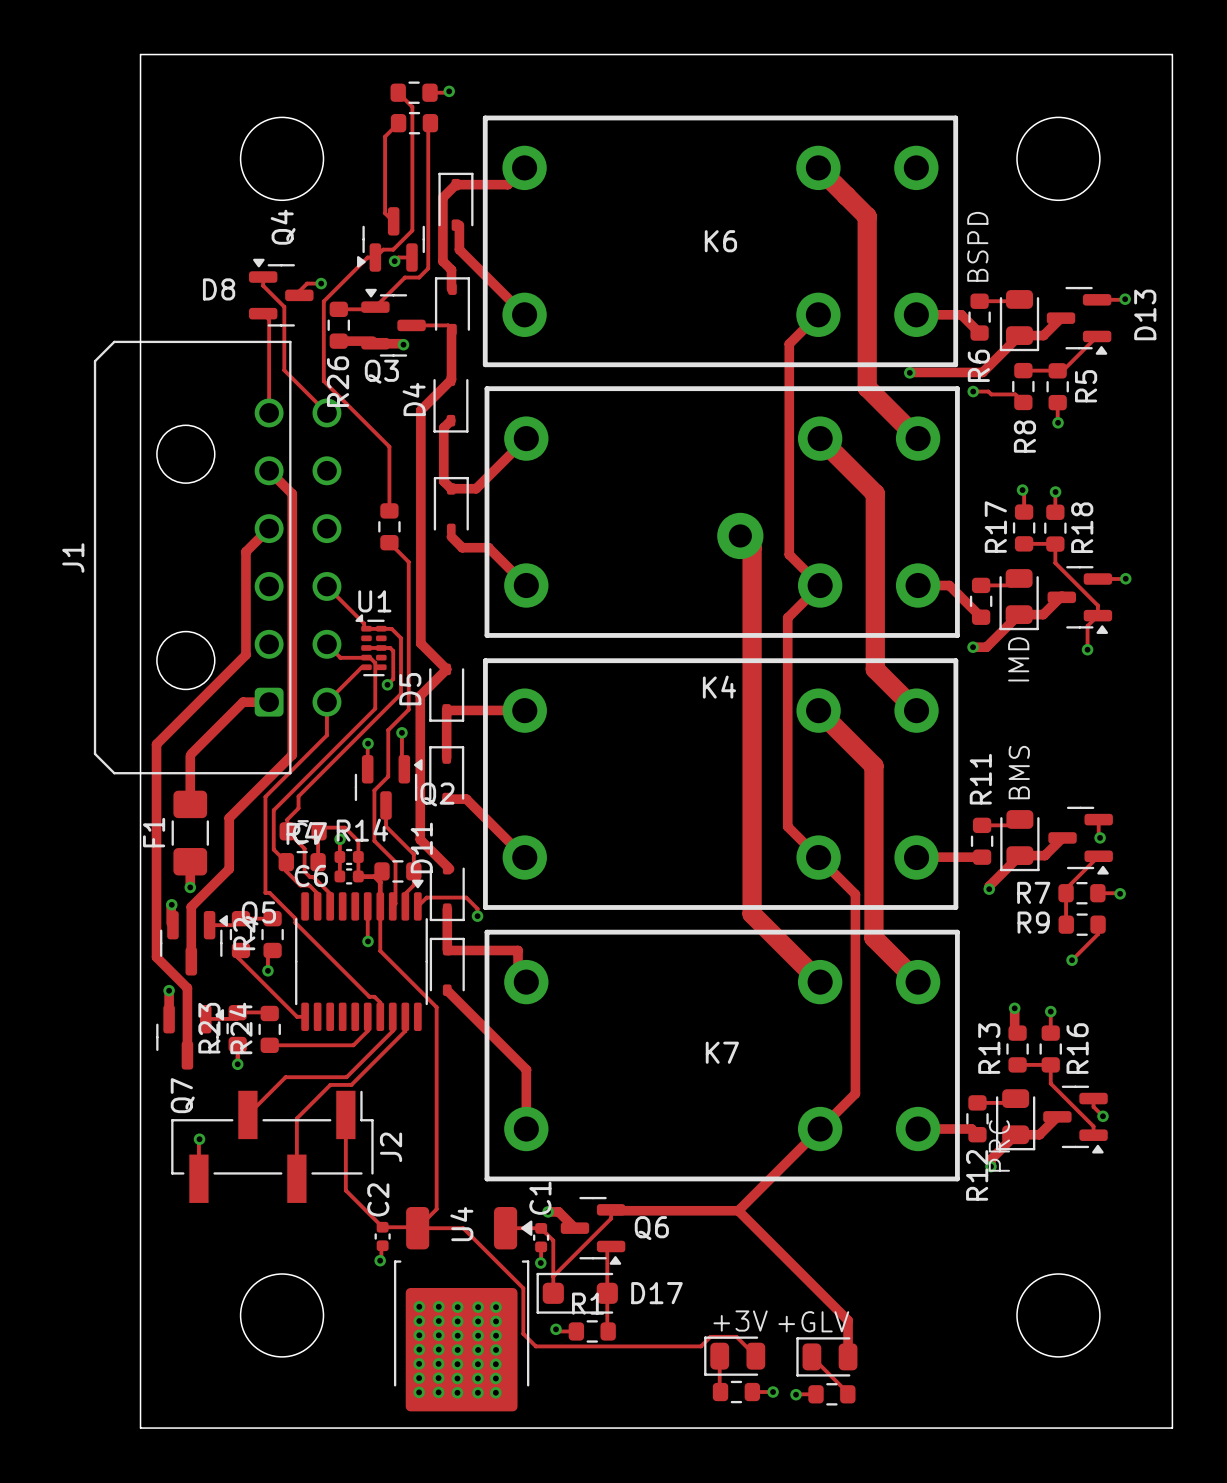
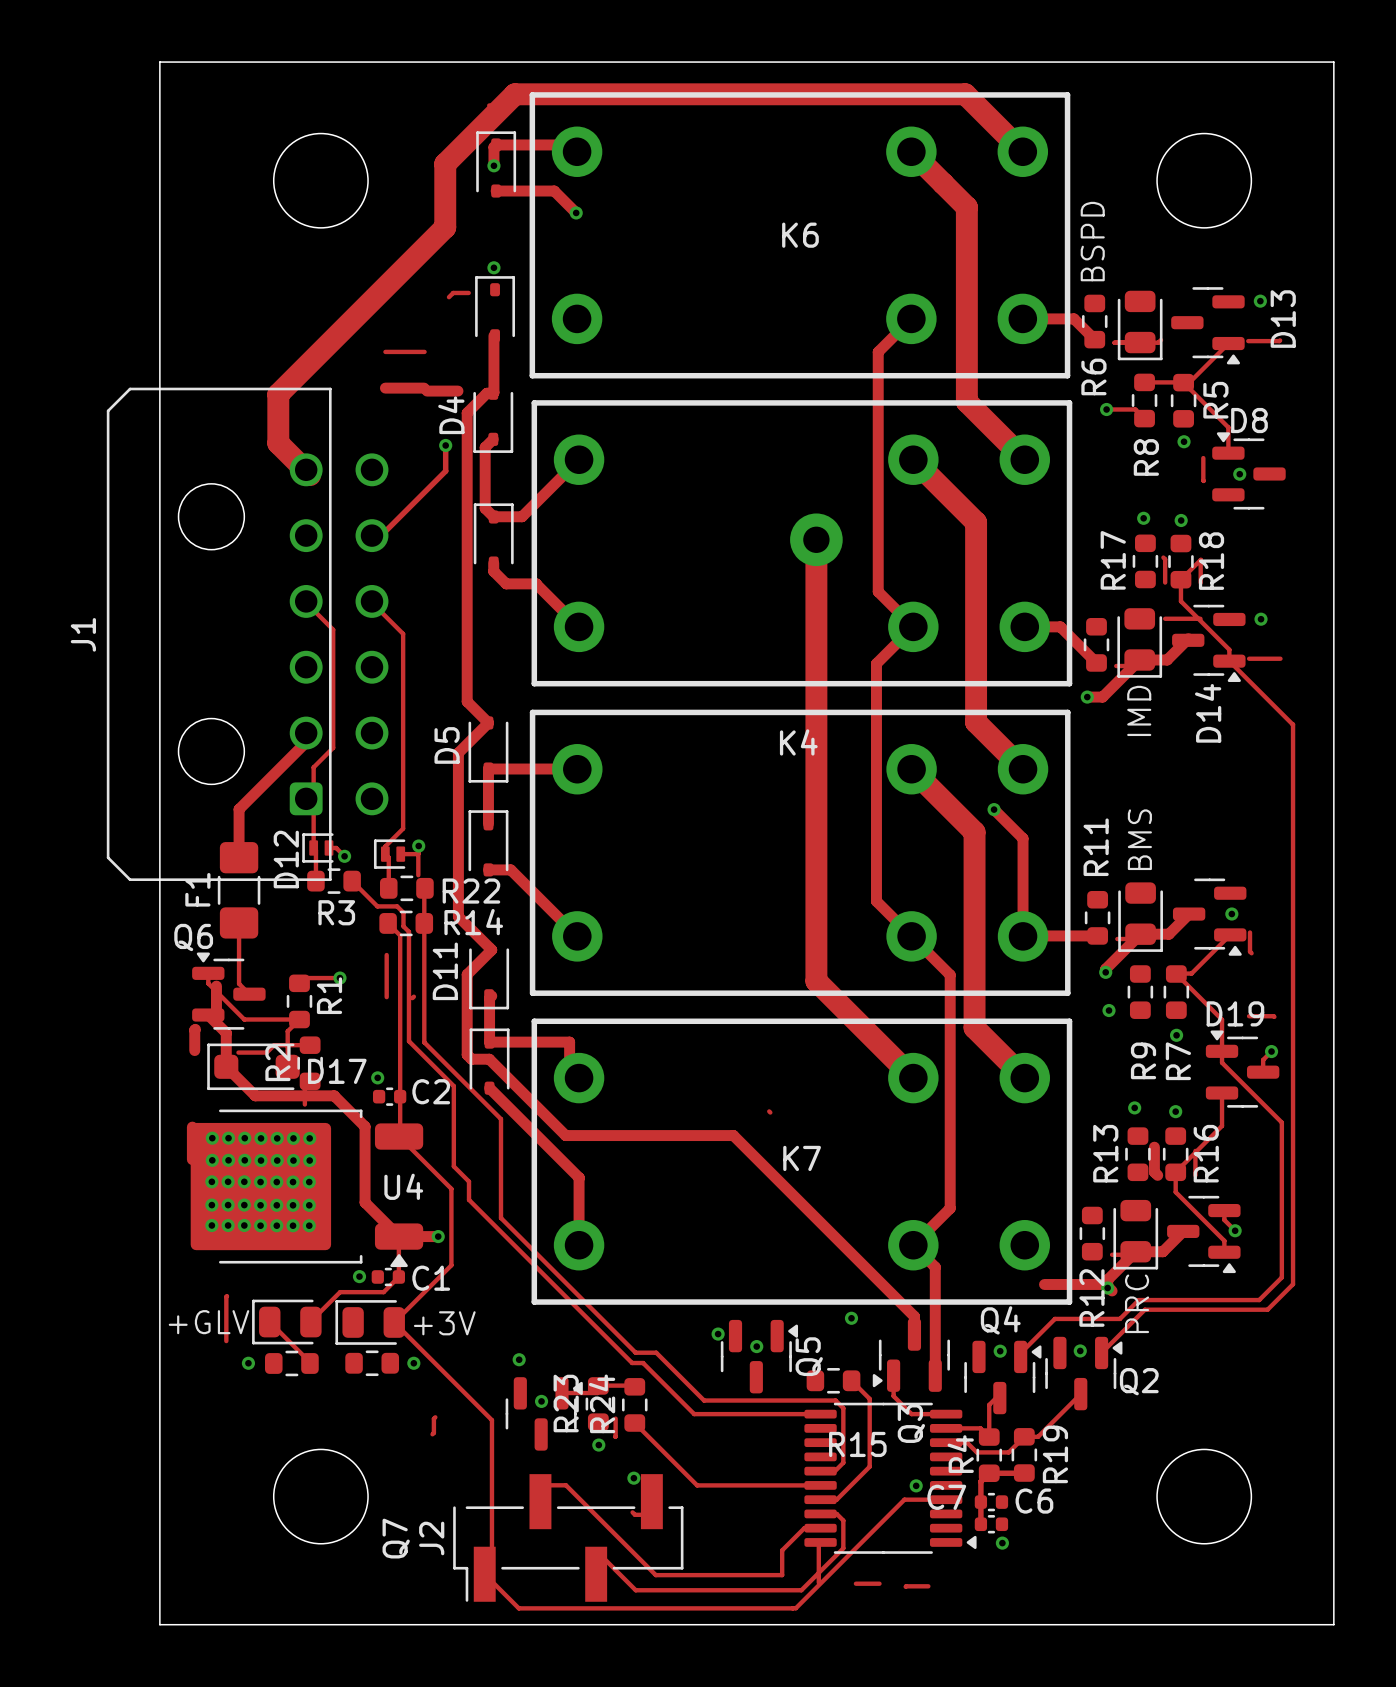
via: (449, 91) -> none
track: (398, 92) (412, 106) (412, 230) (393, 249) (383, 249) (375, 257) (367, 257) (323, 301) (323, 381) (389, 446) (389, 510) -> none
part: (414, 92) -> none
track: (398, 123) (385, 136) (385, 213) (393, 221) -> none
part: (414, 123) -> none
track: (430, 123) (428, 125) (428, 268) (419, 277) (404, 277) (375, 307) -> none
track: none -> (577, 151) (570, 144) (496, 144) (493, 147) (493, 165)
track: none -> (1022, 151) (965, 94) (514, 94) (445, 163) (445, 227) (278, 394) (278, 443) (310, 475)
part: none -> (496, 164)
via: none -> (493, 165)
track: (518, 161) (524, 167) (507, 184) (455, 184) (442, 197) (442, 261) (451, 269) (451, 289) -> none
track: none -> (496, 191) (554, 191) (576, 212)
track: (818, 167) (867, 216) (867, 387) (918, 438) -> (911, 151) (966, 207) (966, 401) (1024, 459)
via: none -> (576, 212)
part: (455, 201) -> none
track: (459, 225) (459, 249) (524, 314) -> none
Q4 name position: Q4 (283, 227) -> Q4 (1000, 1320)
Q4 rotation: 0° (390, 239) -> 180° (1002, 1377)
Q4 position: (390, 239) -> (1002, 1377)
K6 position: (720, 241) -> (799, 235)
text position: BSPD (977, 246) -> BSPD (1092, 241)
via position: (394, 261) -> (493, 267)
part: none -> (495, 309)
track: (263, 277) (263, 285) (284, 306) (284, 370) (326, 412) -> none
track: none -> (911, 318) (878, 352) (878, 591) (913, 626) (876, 663) (876, 901) (950, 974) (950, 1208) (913, 1245) (935, 1267) (935, 1375)
track: (321, 283) (307, 283) (299, 291) (299, 295) -> none
via: (321, 283) -> none
D8 name position: D8 (219, 289) -> D8 (1249, 420)
D8 position: (281, 292) -> (1248, 470)
track: none -> (493, 335) (493, 392) (486, 393) (467, 413) (467, 701) (488, 722) (458, 753) (458, 916) (491, 949) (467, 974) (467, 1054) (471, 1059) (489, 1059) (565, 1135) (733, 1135) (914, 1316) (914, 1334)
via position: (1125, 299) -> (1260, 301)
part: (452, 306) -> none
track: (263, 313) (269, 319) (269, 412) -> none
track: (916, 314) (961, 314) (979, 333) -> (1022, 318) (1074, 318) (1094, 339)
R6 position: (979, 317) -> (1094, 321)
track: (1061, 318) (1043, 335) (1019, 335) (982, 372) (909, 372) -> none
D13 position: (1019, 320) -> (1140, 325)
part position: (1079, 320) -> (1207, 325)
Q3 rotation: 0° (393, 322) -> 90° counterclockwise (911, 1355)
Q3 position: (393, 322) -> (911, 1355)
R26: (338, 325) -> none
track: (411, 325) (448, 325) (452, 329) (450, 331) -> none
track: (451, 329) (451, 379) (420, 410) (420, 643) (446, 669) (420, 695) (420, 839) (449, 868) -> none
track: none -> (1144, 382) (1183, 382) (1228, 427) (1228, 453)
track: (1097, 336) (1062, 370) (1057, 370) -> (1228, 343) (1189, 382) (1183, 382)
track: (790, 342) (818, 314) (789, 343) (789, 554) (820, 585) (787, 617) (787, 826) (855, 894) (855, 1093) (738, 1210) -> none
via position: (403, 344) -> (445, 445)
track: none -> (1106, 409) (1135, 409) (1144, 418)
track: (1023, 370) (1057, 370) -> none
via: (909, 372) -> none
R5 position: (1023, 386) -> (1144, 400)
R8 position: (1057, 386) -> (1183, 400)
via: none -> (1184, 441)
track: none -> (445, 445) (445, 471) (375, 540)
track: (973, 391) (988, 391) (991, 394) (1015, 394) (1023, 402) -> none
via position: (973, 391) -> (1106, 409)
D4 position: (450, 403) -> (493, 419)
via: none -> (1239, 474)
track: (450, 420) (443, 427) (443, 481) (451, 488) -> (493, 439) (485, 447) (485, 508) (493, 516)
via: (1058, 422) -> none
track: (526, 438) (476, 488) (451, 488) -> (579, 459) (522, 516) (493, 516)
track: (820, 438) (875, 493) (875, 669) (916, 710) -> (913, 459) (976, 522) (976, 722) (1023, 769)
via: none -> (1143, 518)
via: none -> (1181, 520)
track: (269, 470) (292, 493) (292, 754) (229, 818) (229, 868) (191, 906) (191, 961) -> none
track: none -> (816, 539) (816, 981) (913, 1078)
via: (1022, 490) -> none
track: none -> (1200, 559) (1180, 579) (1180, 601) (1229, 649) (1229, 661) (1292, 724)
via: (1055, 492) -> none
track: none -> (493, 563) (493, 571) (506, 583) (536, 583)
part position: (451, 506) -> (493, 536)
part position: (722, 512) -> (801, 543)
part: (389, 526) -> none
R17 position: (1024, 527) -> (1145, 561)
track: (269, 528) (245, 551) (245, 654) (156, 744) (156, 957) (187, 988) (187, 1055) -> none
R18 position: (1055, 528) -> (1180, 561)
track: none -> (310, 606) (333, 629) (333, 747) (313, 767) (313, 847) (315, 850) (315, 881)
track: none -> (375, 606) (403, 633) (403, 828) (385, 846) (385, 854) (388, 857) (388, 888)
track: (740, 535) (752, 547) (752, 914) (820, 982) -> none
via position: (740, 535) -> (816, 539)
track: (451, 536) (462, 547) (488, 547) -> none
track: (389, 542) (408, 562) (408, 709) (388, 730) (388, 776) (374, 790) (374, 840) (395, 862) (395, 903) (392, 906) -> none
track: (1055, 544) (1055, 563) (1097, 605) (1097, 615) (1087, 626) (1087, 649) -> none
via: none -> (1261, 619)
track: (488, 547) (526, 585) -> (536, 584) (579, 626)
D14: none -> (1139, 642)
via: (1125, 578) -> none
track: (918, 585) (949, 585) (981, 617) -> (1024, 626) (1060, 626) (1096, 662)
track: (326, 586) (364, 623) (364, 628) (391, 628) (401, 638) (401, 693) (298, 796) (298, 808) (287, 819) (287, 831) (304, 848) (304, 871) (310, 877) (313, 877) (330, 893) (330, 906) -> none
track: (1061, 595) (1043, 614) (1019, 614) (986, 647) (973, 647) -> (1188, 638) (1167, 660) (1139, 660) (1102, 697) (1087, 697)
part: (1019, 599) -> none
part position: (1079, 600) -> (1208, 643)
part position: (981, 601) -> (1096, 644)
track: none -> (1293, 724) (1293, 1284) (1267, 1309) (1144, 1309) (1101, 1352)
track: (326, 644) (340, 657) (370, 657) (375, 662) (375, 708) (273, 810) (273, 849) (286, 862) (286, 871) (300, 885) (309, 885) (317, 893) (317, 906) -> none
U1: (371, 645) -> none
track: (366, 647) (390, 647) (393, 651) (393, 679) (387, 684) -> none
via position: (973, 647) -> (1087, 697)
track: none -> (310, 738) (239, 809) (239, 857)
via: (1087, 649) -> none
text position: IMD (1018, 659) -> IMD (1139, 710)
track: (364, 667) (361, 667) (326, 702) (326, 735) (265, 796) (265, 892) (269, 892) (295, 918) (295, 922) (369, 996) (374, 996) (380, 1002) (380, 1016) -> none
track: none -> (556, 769) (488, 769) (488, 823)
via: (387, 684) -> none
D5 position: (446, 692) -> (488, 749)
track: (269, 702) (243, 702) (191, 754) (190, 809) -> none
track: (446, 709) (446, 758) -> none
track: (446, 710) (506, 710) -> none
track: (818, 710) (873, 765) (873, 937) (918, 982) -> (911, 769) (974, 832) (974, 1027) (1024, 1078)
track: none -> (994, 809) (1023, 838) (1023, 936) (1097, 935)
via: none -> (994, 809)
via: (401, 732) -> none
D12: none -> (317, 847)
track: none -> (329, 847) (336, 847) (344, 856)
part: none -> (389, 854)
track: none -> (418, 853) (400, 854)
via: none -> (344, 856)
text position: BMS (1019, 772) -> BMS (1139, 839)
R3: none -> (334, 881)
track: none -> (352, 881) (377, 906) (397, 906) (403, 912) (403, 926) (408, 931) (408, 1041) (453, 1086) (453, 1166) (469, 1181) (469, 1199) (632, 1363) (643, 1363) (694, 1414) (820, 1414)
part position: (446, 775) -> (488, 843)
R22: none -> (406, 888)
track: none -> (424, 888) (424, 1042) (500, 1119) (500, 1218) (635, 1352) (656, 1352) (704, 1400) (835, 1400) (843, 1408) (843, 1462) (834, 1471)
K4 position: (720, 784) -> (800, 852)
Q2 position: (388, 787) -> (1083, 1373)
track: (446, 799) (466, 799) (524, 857) -> (488, 869) (510, 869) (577, 936)
track: (386, 805) (386, 826) (413, 854) (413, 885) (405, 893) (405, 906) -> none
track: none -> (239, 922) (239, 983) (249, 994)
track: none -> (388, 923) (400, 935) (399, 1136) (451, 1188) (451, 1265) (394, 1322) (491, 1420) (491, 1557)
track: none -> (1230, 934) (1191, 973) (1180, 973)
R14 position: (303, 831) -> (406, 923)
F1 position: (190, 833) -> (239, 890)
track: (1062, 837) (1044, 855) (1019, 855) (989, 886) (989, 889) -> (1189, 914) (1169, 934) (1140, 934) (1105, 969) (1105, 972)
via position: (1100, 837) -> (1231, 914)
via position: (340, 839) -> (339, 978)
part position: (1019, 840) -> (1140, 917)
part position: (1080, 840) -> (1209, 917)
R11 position: (982, 841) -> (1097, 917)
D11 name position: D11 (421, 847) -> D11 (445, 971)
via: none -> (1105, 972)
track: none -> (208, 973) (208, 983) (244, 1019) (299, 1019) (287, 1031) (287, 1066)
C7 position: (349, 856) -> (991, 1524)
track: none -> (1176, 974) (1222, 1019) (1222, 1062) (1281, 1122) (1281, 1277) (1259, 1300) (1138, 1300) (1119, 1318) (1054, 1318) (1020, 1352)
track: (1098, 856) (1064, 890) -> none
track: (982, 857) (916, 857) -> none
track: none -> (339, 978) (304, 978) (299, 983)
R4 rotation: 0° (302, 862) -> 90° clockwise (989, 1455)
R4 position: (302, 862) -> (989, 1455)
track: (318, 862) (318, 832) (322, 827) (344, 827) (358, 841) (358, 876) -> none
part: (397, 871) -> none
C6 name position: C6 (311, 875) -> C6 (1034, 1501)
track: none -> (491, 996) (489, 998) (489, 1042) (569, 1042) (569, 1068) (579, 1078)
C6 position: (349, 876) -> (991, 1502)
track: (354, 876) (374, 876) (380, 882) (380, 950) (436, 1007) (436, 1209) (417, 1228) -> none
via: (190, 887) -> none
via position: (989, 889) -> (1109, 1010)
track: none -> (208, 1015) (226, 1033) (226, 1066) (255, 1095) (334, 1095) (365, 1126) (365, 1202) (399, 1236) (438, 1236)
D11 position: (447, 892) -> (489, 976)
R7 name position: R7 (1033, 892) -> R7 (1178, 1061)
track: (1066, 893) (1066, 924) -> none
R7 rotation: 0° (1081, 893) -> 90° clockwise (1176, 992)
R7 position: (1081, 893) -> (1176, 992)
via: (1120, 893) -> none
via: (171, 904) -> none
track: (367, 906) (368, 941) -> none
track: (417, 906) (426, 897) (466, 897) (477, 908) (477, 916) -> none
track: (447, 909) (447, 949) -> none
via: none -> (1176, 1035)
Q5 name rotation: 0° (258, 913) -> 90° counterclockwise (809, 1356)
via: (477, 916) -> none
R9 name position: R9 (1033, 922) -> R9 (1143, 1060)
R9 rotation: 0° (1082, 924) -> 90° clockwise (1140, 992)
R9 position: (1082, 924) -> (1140, 992)
track: (1098, 924) (1098, 934) (1072, 960) -> none
track: none -> (1271, 1051) (1263, 1059) (1263, 1072)
via: none -> (1271, 1051)
part: (240, 934) -> none
D19: none -> (1242, 1069)
via: (368, 941) -> none
Q5 position: (193, 943) -> (759, 1356)
via: none -> (377, 1077)
track: (237, 950) (237, 957) (297, 1016) (305, 1016) -> none
track: (447, 950) (518, 950) (518, 973) (526, 982) -> none
part: (361, 955) -> none
via: (1072, 960) -> none
track: none -> (1222, 1093) (1222, 1125) (1175, 1172) (1175, 1192) (1224, 1240) (1224, 1252)
part position: (447, 966) -> (489, 1061)
via: (267, 970) -> none
via: none -> (1134, 1107)
track: none -> (769, 1111) (770, 1112)
via: none -> (1175, 1111)
via: (169, 990) -> none
track: (447, 990) (526, 1069) -> (489, 1088) (579, 1177)
via: none -> (212, 1138)
via: none -> (228, 1138)
via: none -> (244, 1138)
via: none -> (261, 1138)
via: none -> (277, 1138)
via: none -> (293, 1138)
via: none -> (309, 1138)
via: (1014, 1008) -> none
via: (1050, 1011) -> none
track: (275, 1013) (243, 1012) (236, 1018) (211, 1018) -> (641, 1386) (604, 1385) (597, 1393) (568, 1393)
track: (367, 1016) (367, 1031) (353, 1045) (270, 1045) -> none
track: (392, 1016) (392, 1031) (346, 1077) (285, 1077) (247, 1114) -> none
track: (405, 1016) (405, 1031) (351, 1084) (330, 1084) (296, 1118) (296, 1178) -> none
via: none -> (212, 1160)
via: none -> (228, 1160)
via: none -> (244, 1160)
via: none -> (261, 1160)
via: none -> (277, 1160)
via: none -> (293, 1160)
via: none -> (309, 1160)
R23 position: (237, 1028) -> (598, 1404)
R24 position: (269, 1029) -> (634, 1404)
Q7 position: (190, 1037) -> (544, 1413)
via: none -> (211, 1181)
via: none -> (228, 1181)
via: none -> (244, 1181)
via: none -> (260, 1182)
via: none -> (276, 1182)
via: none -> (293, 1182)
via: none -> (309, 1182)
R13 position: (1017, 1049) -> (1137, 1154)
R16 position: (1050, 1049) -> (1175, 1154)
K7 position: (722, 1055) -> (801, 1161)
via: none -> (211, 1205)
via: none -> (228, 1205)
via: none -> (244, 1205)
via: none -> (260, 1205)
via: none -> (276, 1205)
via: none -> (293, 1205)
via: none -> (309, 1205)
via: (237, 1064) -> none
track: (1017, 1064) (1050, 1064) (1050, 1083) (1093, 1126) (1093, 1135) -> none
track: (526, 1070) (526, 1129) -> (579, 1178) (579, 1245)
via: none -> (211, 1225)
via: none -> (228, 1225)
via: none -> (244, 1225)
via: none -> (260, 1225)
via: none -> (276, 1225)
via: none -> (293, 1225)
via: none -> (309, 1225)
via: none -> (438, 1236)
track: none -> (398, 1236) (398, 1276) (383, 1292) (340, 1292) (310, 1321)
Q7 name position: Q7 (182, 1095) -> Q7 (396, 1538)
track: (1093, 1098) (1093, 1106) (1102, 1116) -> (1224, 1210) (1224, 1220) (1235, 1230)
track: (345, 1114) (345, 1190) (382, 1227) (417, 1228) -> none
track: (1057, 1116) (1039, 1134) (1015, 1134) (990, 1159) (990, 1166) -> (1183, 1231) (1162, 1251) (1135, 1251) (1107, 1279) (1107, 1288)
via position: (1102, 1116) -> (1235, 1230)
R12 position: (977, 1118) -> (1092, 1233)
part position: (1015, 1119) -> (1135, 1234)
part position: (1075, 1119) -> (1203, 1234)
via: none -> (359, 1276)
via: none -> (1107, 1288)
via: (199, 1139) -> none
J2 rotation: 0° (272, 1146) -> 180° (568, 1537)
J2 position: (272, 1146) -> (568, 1537)
via: none -> (851, 1318)
text: none -> +GLV (209, 1322)
track: none -> (269, 1322) (309, 1363)
part: none -> (286, 1322)
part: none -> (370, 1322)
via: (990, 1166) -> none
via: none -> (718, 1334)
via: none -> (756, 1346)
via: none -> (1000, 1351)
via: none -> (1080, 1350)
via: none -> (519, 1359)
via: none -> (248, 1363)
part: none -> (291, 1363)
part: none -> (372, 1363)
via: none -> (413, 1363)
track: none -> (893, 1375) (893, 1396) (911, 1414) (946, 1414)
track: (738, 1210) (611, 1209) (611, 1218) (553, 1276) -> none
track: (738, 1210) (848, 1320) (848, 1356) -> none
track: (548, 1211) (558, 1211) (574, 1228) -> none
via: (548, 1211) -> none
R15: none -> (833, 1380)
track: none -> (851, 1380) (869, 1398) (869, 1466) (836, 1499) (820, 1499)
track: none -> (1000, 1394) (989, 1404) (989, 1437) (980, 1428) (946, 1428)
track: none -> (1080, 1394) (1038, 1436) (1024, 1436) (1008, 1452) (976, 1452) (967, 1442) (946, 1442)
track: (417, 1228) (463, 1228) (523, 1288) (523, 1333) (535, 1346) (700, 1346) (710, 1336) (736, 1336) (755, 1356) -> none
track: (505, 1228) (540, 1228) (553, 1240) (553, 1293) -> none
Q6 name position: Q6 (651, 1228) -> Q6 (193, 937)
Q6 rotation: 0° (593, 1230) -> 180° (228, 991)
Q6 position: (593, 1230) -> (228, 991)
via: none -> (541, 1401)
C2 rotation: 0° (382, 1236) -> 90° clockwise (389, 1096)
C2 position: (382, 1236) -> (389, 1096)
C1 rotation: 0° (541, 1237) -> 90° clockwise (388, 1276)
C1 position: (541, 1237) -> (388, 1276)
track: (611, 1246) (607, 1250) (608, 1331) -> none
track: none -> (634, 1423) (697, 1485) (820, 1485)
via: (380, 1260) -> none
via position: (540, 1263) -> (598, 1445)
R19: none -> (1024, 1454)
D17 position: (577, 1293) -> (253, 1066)
D17 name position: D17 (656, 1293) -> D17 (337, 1071)
track: none -> (1024, 1473) (989, 1473) (980, 1481) (980, 1524)
via: none -> (633, 1478)
part: none -> (890, 1478)
track: none -> (547, 1485) (566, 1485) (655, 1575) (782, 1575) (782, 1550) (804, 1528) (820, 1528)
via: (419, 1306) -> none
via: (438, 1306) -> none
via: none -> (916, 1485)
via: (457, 1307) -> none
via: (478, 1307) -> none
via: (496, 1307) -> none
U4 rotation: 0° (463, 1309) -> 90° clockwise (306, 1188)
U4 position: (463, 1309) -> (306, 1188)
track: none -> (946, 1499) (904, 1499) (795, 1608) (792, 1608)
via: (419, 1321) -> none
via: (438, 1321) -> none
via: (457, 1321) -> none
via: (478, 1321) -> none
via: (496, 1321) -> none
text position: +3V (740, 1321) -> +3V (444, 1323)
text: +GLV (813, 1321) -> none
via: (556, 1329) -> none
track: none -> (820, 1513) (836, 1513) (843, 1520) (843, 1548) (801, 1590) (635, 1590) (603, 1557)
R1 rotation: 0° (592, 1331) -> 90° clockwise (299, 1001)
R1 position: (592, 1331) -> (299, 1001)
via: (419, 1335) -> none
via: (438, 1335) -> none
via: (457, 1335) -> none
via: (478, 1335) -> none
via: (496, 1335) -> none
via: (419, 1349) -> none
via: (438, 1349) -> none
via: (457, 1349) -> none
via: (478, 1349) -> none
via: (496, 1349) -> none
part: (734, 1356) -> none
track: (811, 1356) (847, 1394) -> none
part: (826, 1356) -> none
via: none -> (1002, 1543)
via: (419, 1363) -> none
via: (438, 1363) -> none
via: (457, 1364) -> none
via: (477, 1364) -> none
via: (495, 1364) -> none
via: (419, 1378) -> none
via: (438, 1378) -> none
via: (457, 1378) -> none
via: (477, 1378) -> none
via: (495, 1378) -> none
track: none -> (484, 1574) (518, 1608) (792, 1608)
via: (419, 1392) -> none
via: (438, 1392) -> none
via: (457, 1392) -> none
via: (477, 1392) -> none
via: (495, 1392) -> none
part: (736, 1392) -> none
via: (773, 1392) -> none
via: (796, 1394) -> none
part: (831, 1394) -> none

